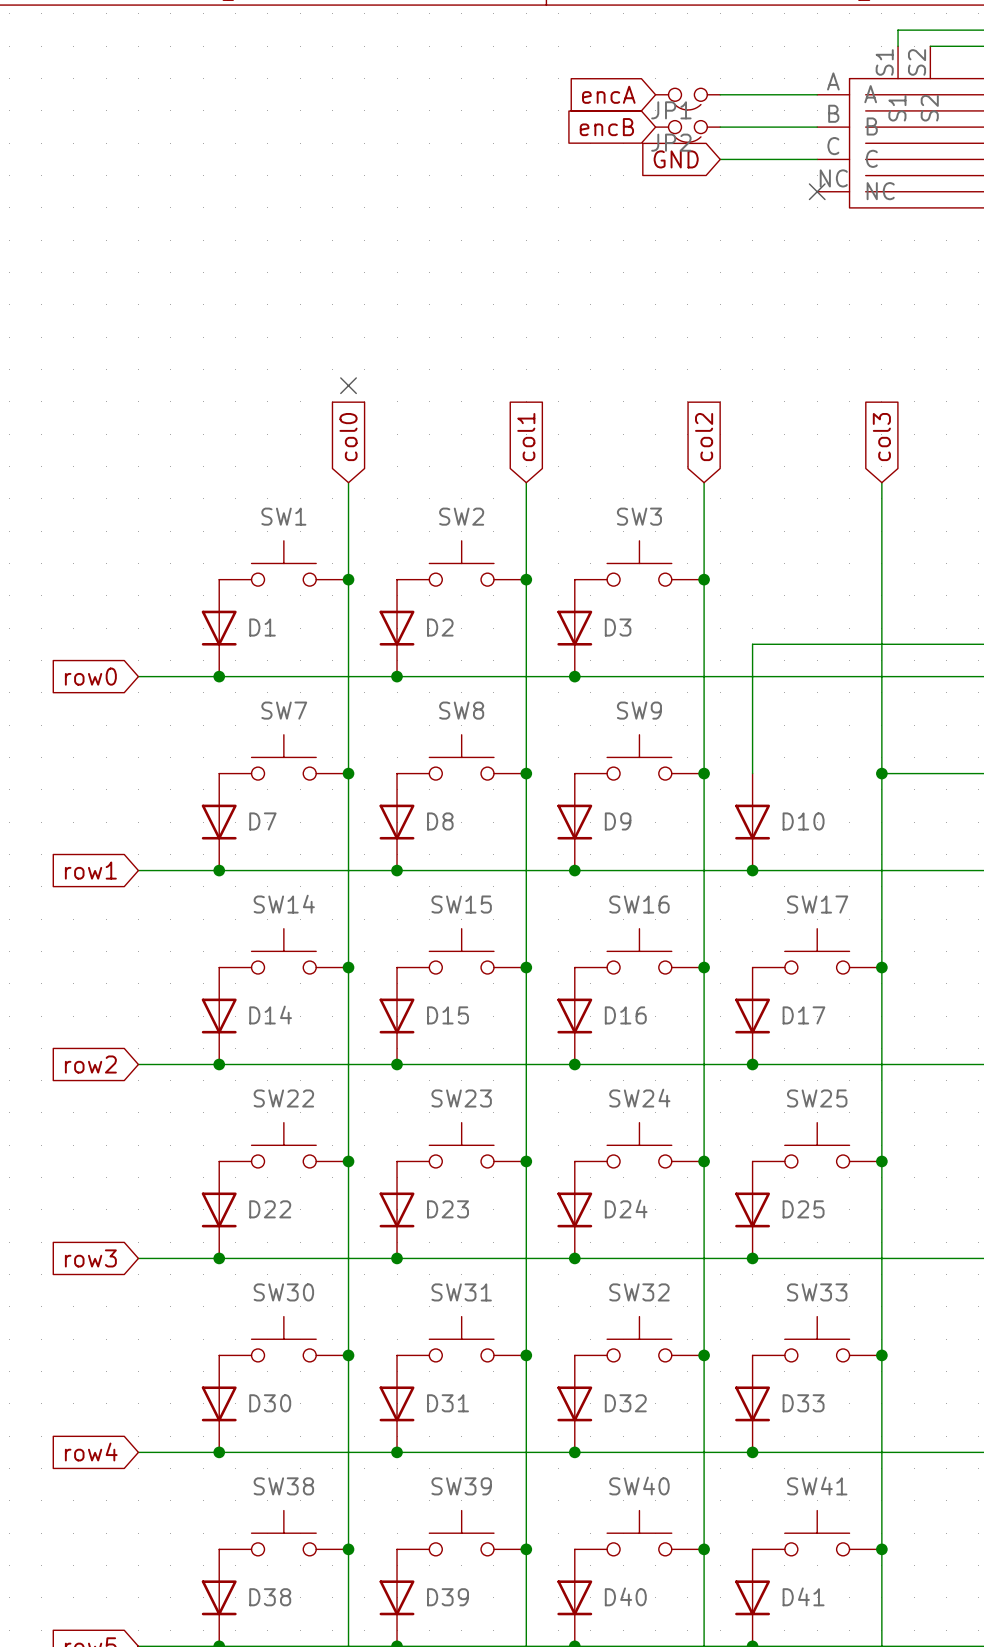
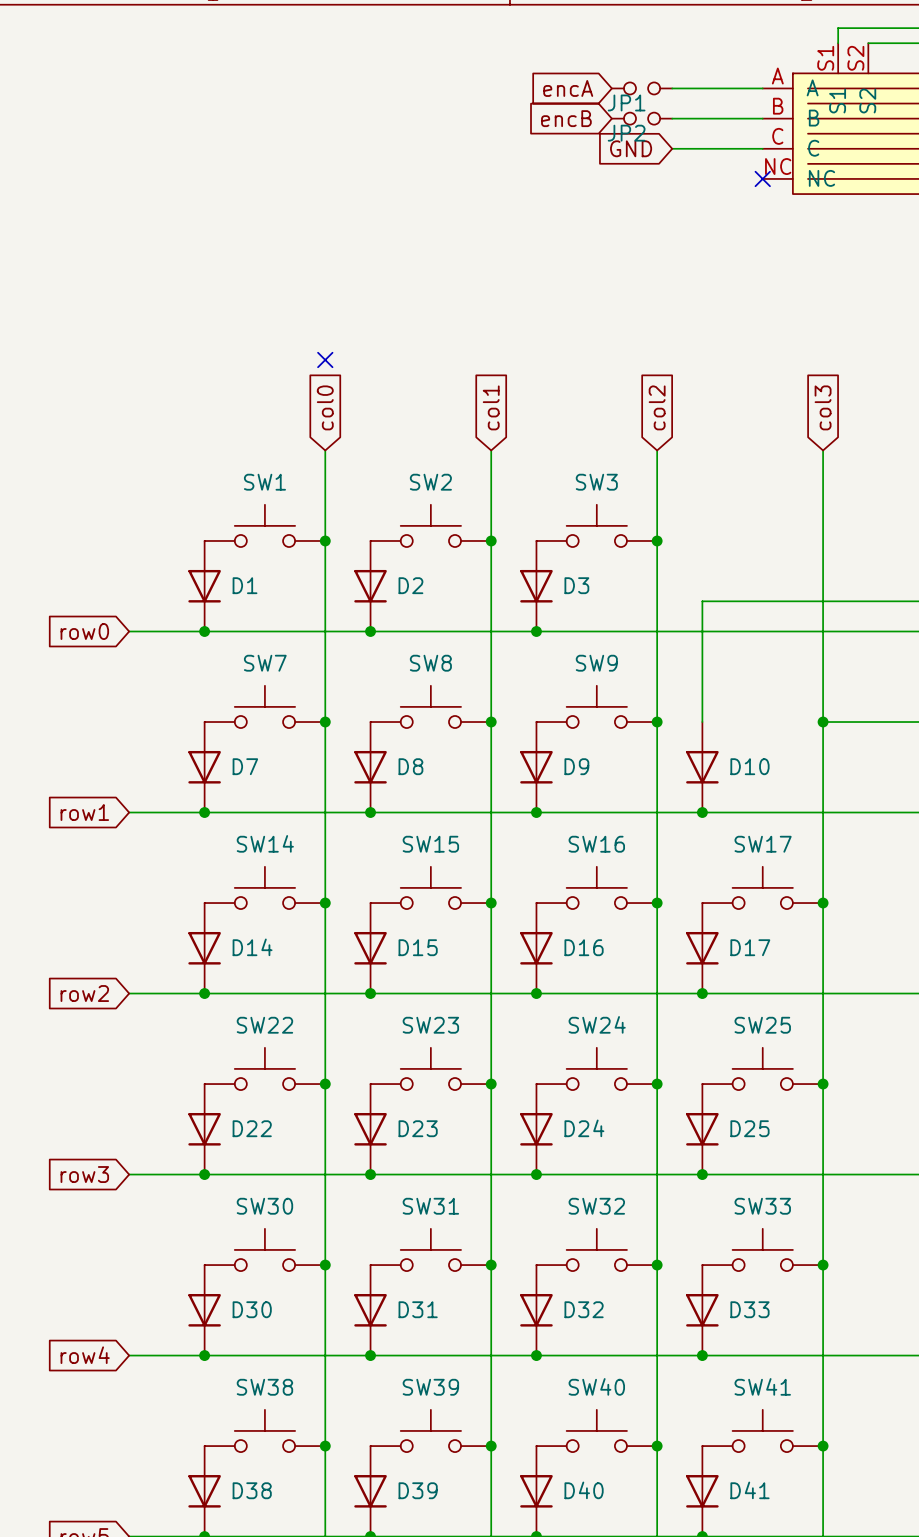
JP1 symbol: [655, 88, 721, 110] -> [611, 82, 673, 95]
JP2 symbol: [655, 120, 721, 143] -> [611, 112, 673, 125]

